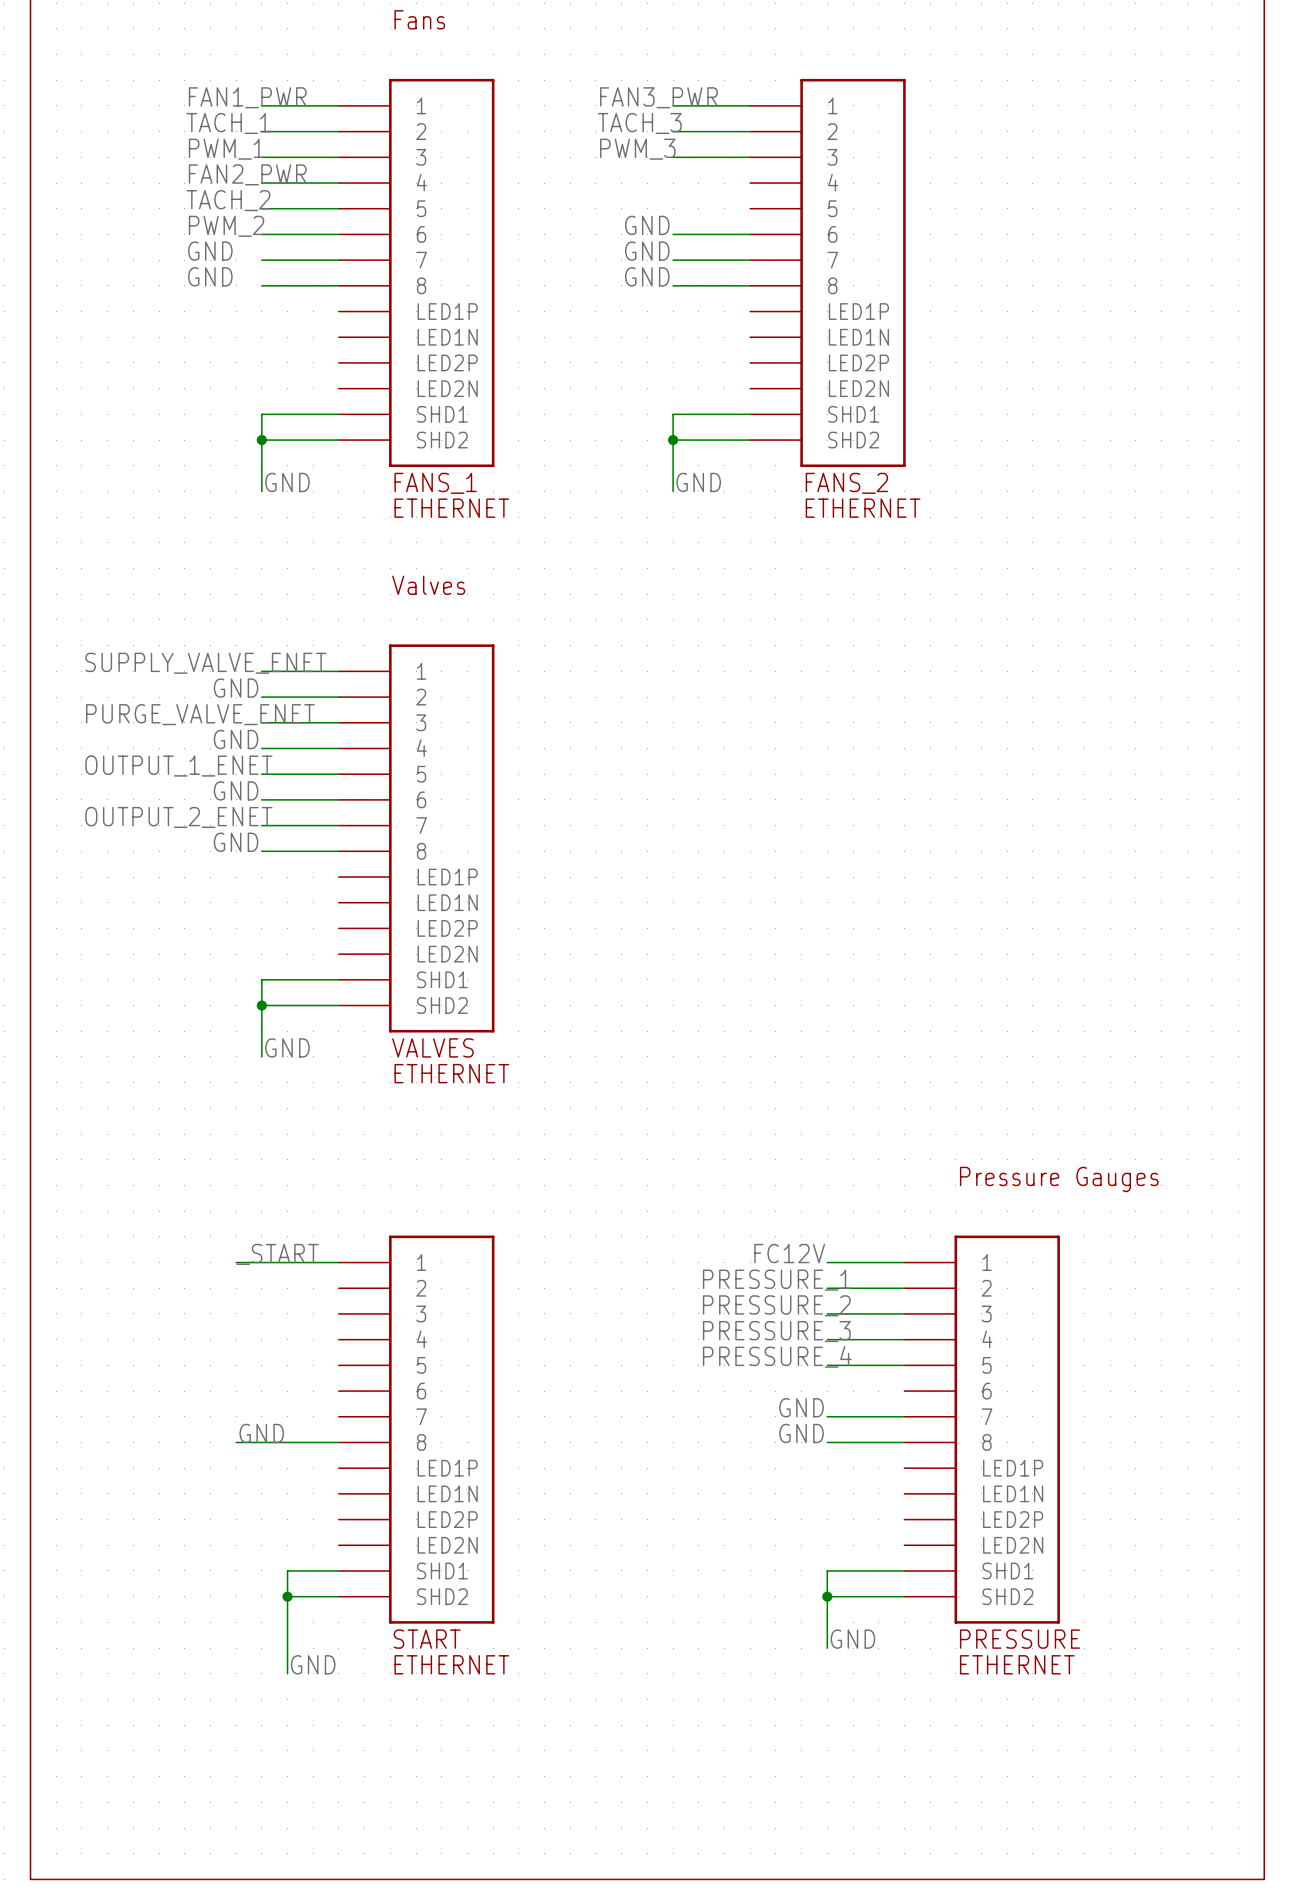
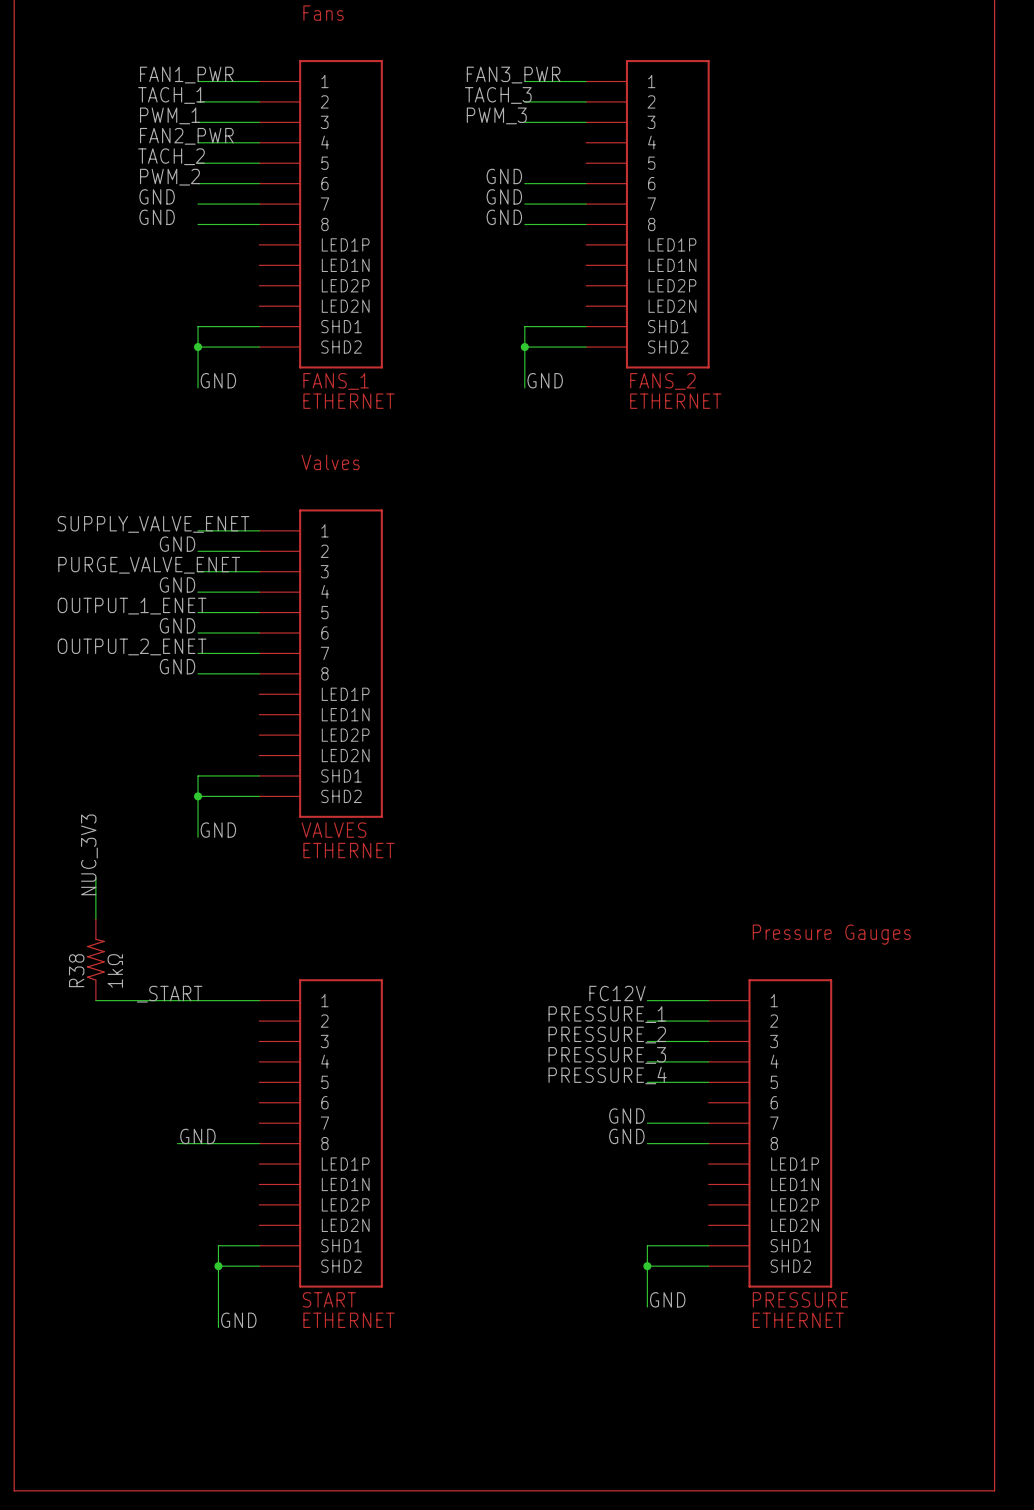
label: none -> NUC_3V3 (89, 854)
wire: none -> (95, 878) (95, 918)
R38: none -> 1kΩ (95, 959)
label position: _START (277, 1254) -> _START (169, 994)
wire: none -> (95, 1000) (177, 1000)

